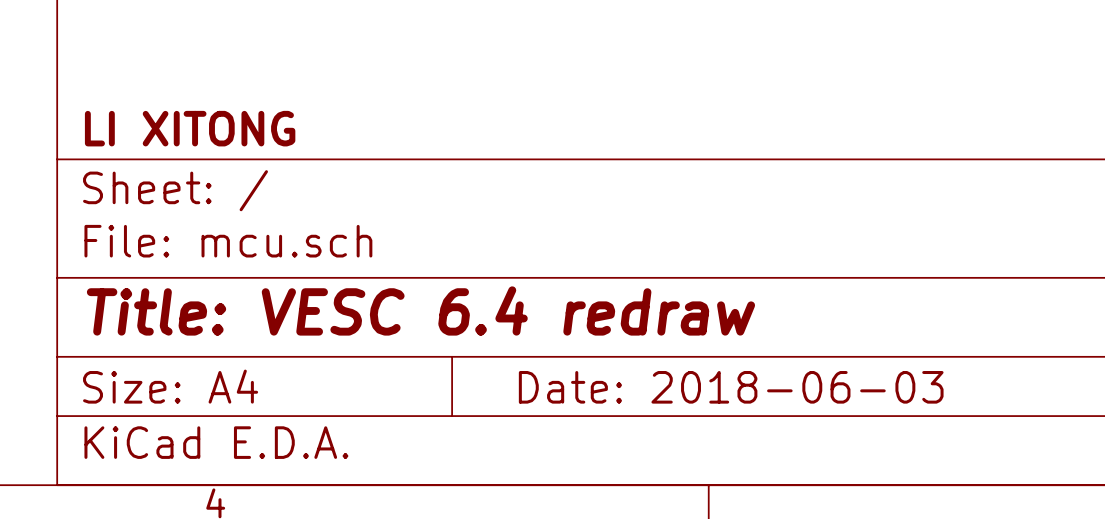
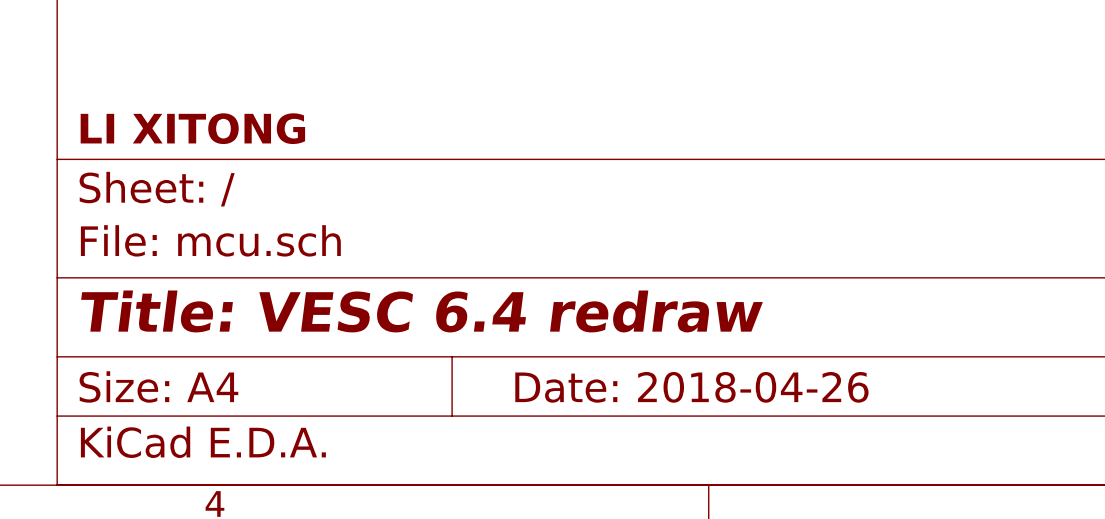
title block: Date: 2018-06-03 (731, 387) -> Date: 2018-04-26 (691, 387)

